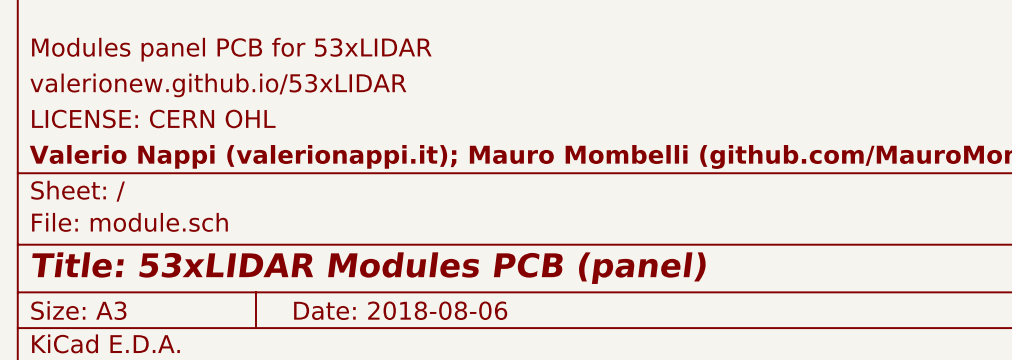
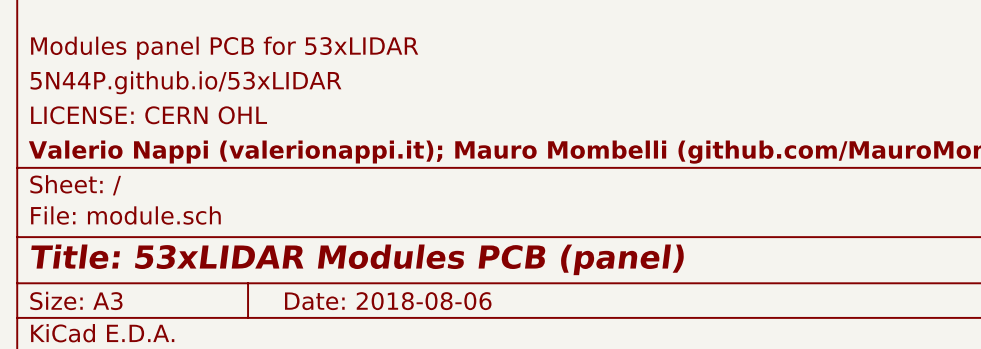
title block: valerionew.github.io/53xLIDAR (218, 85) -> 5N44P.github.io/53xLIDAR (185, 82)

